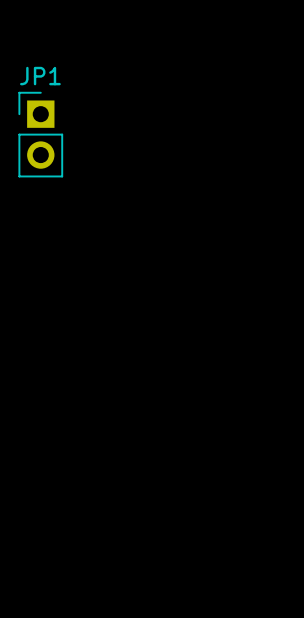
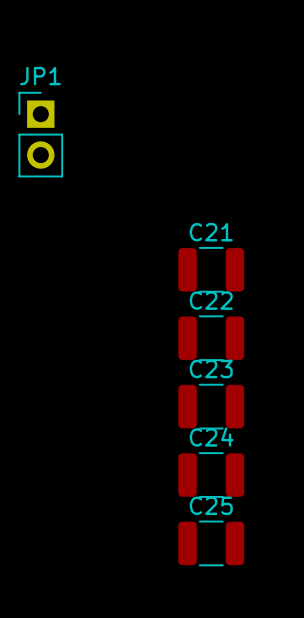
C21: none -> (211, 269)
C22: none -> (211, 338)
C23: none -> (211, 406)
C24: none -> (211, 475)
C25: none -> (211, 543)

